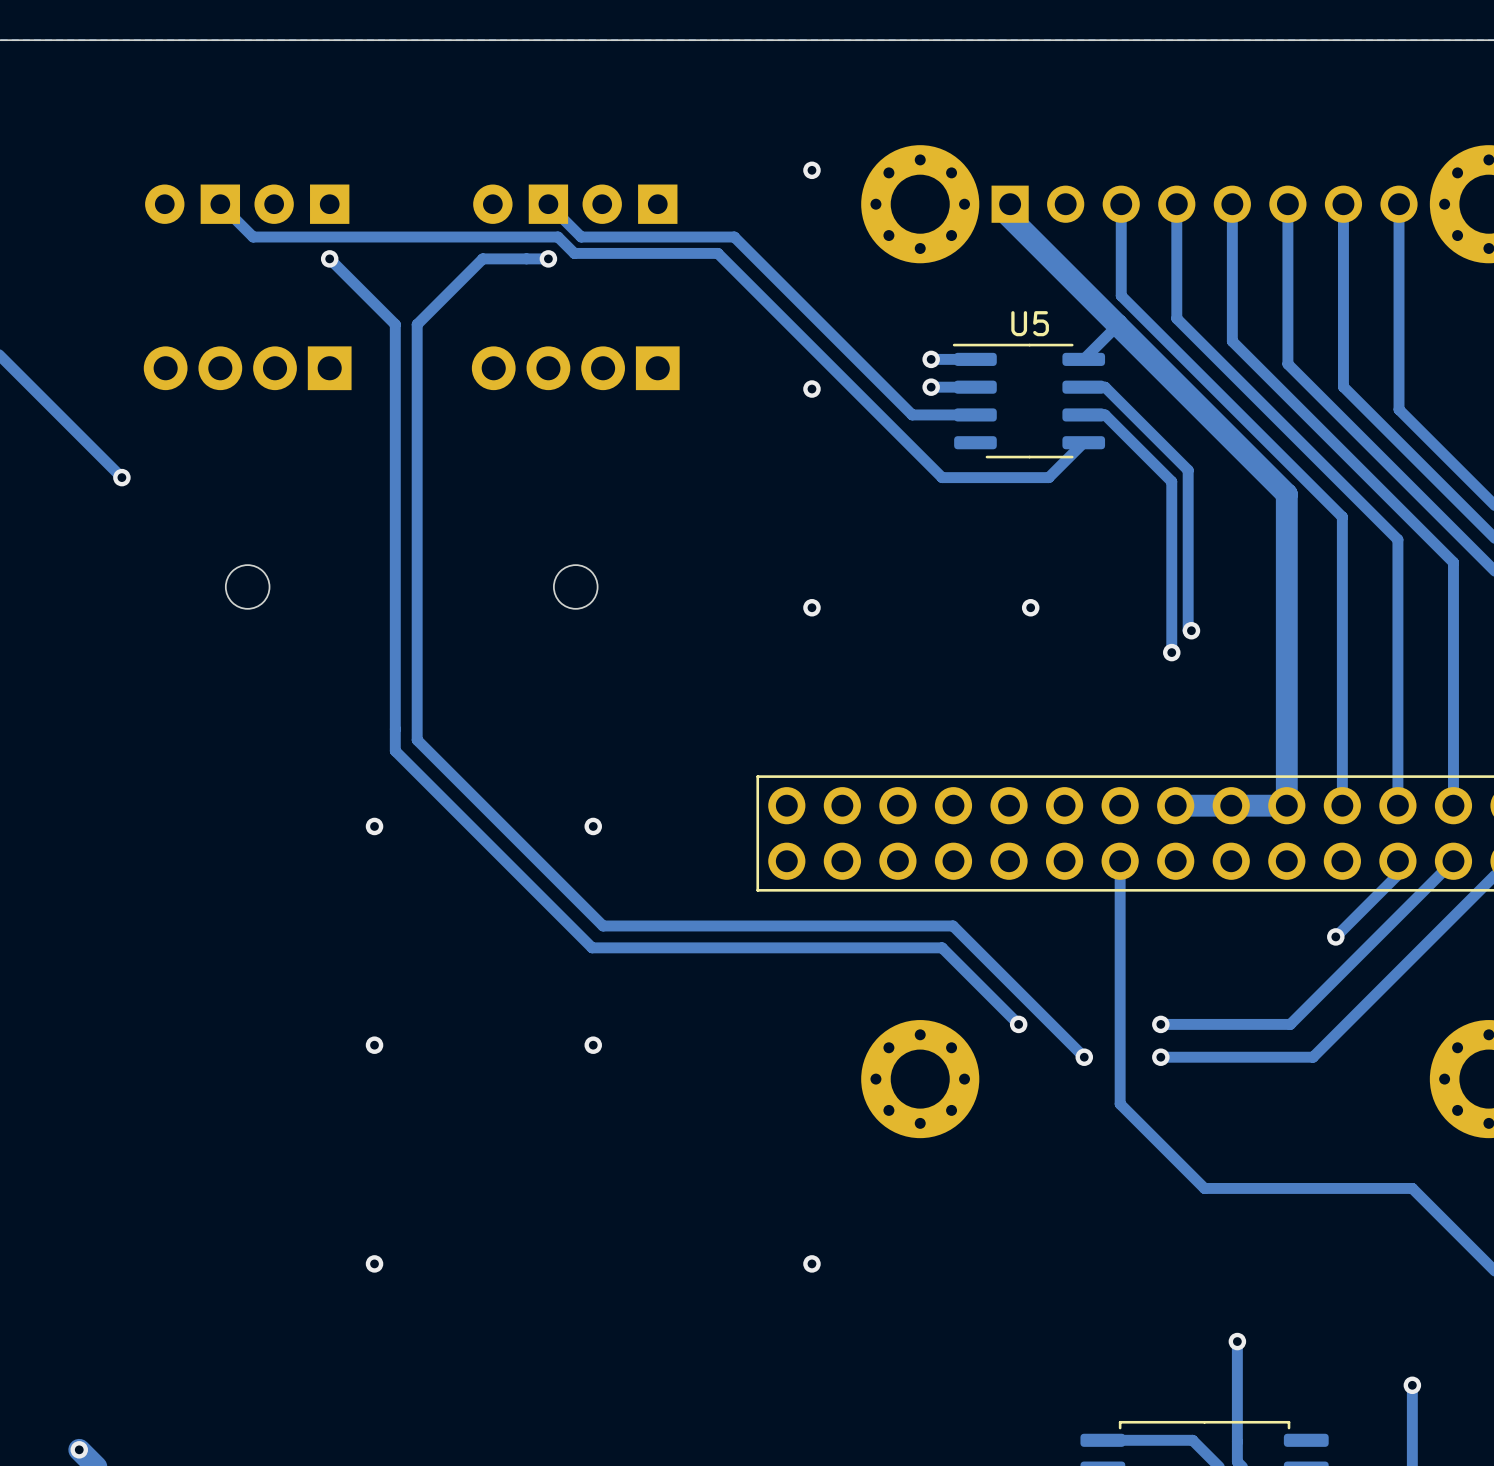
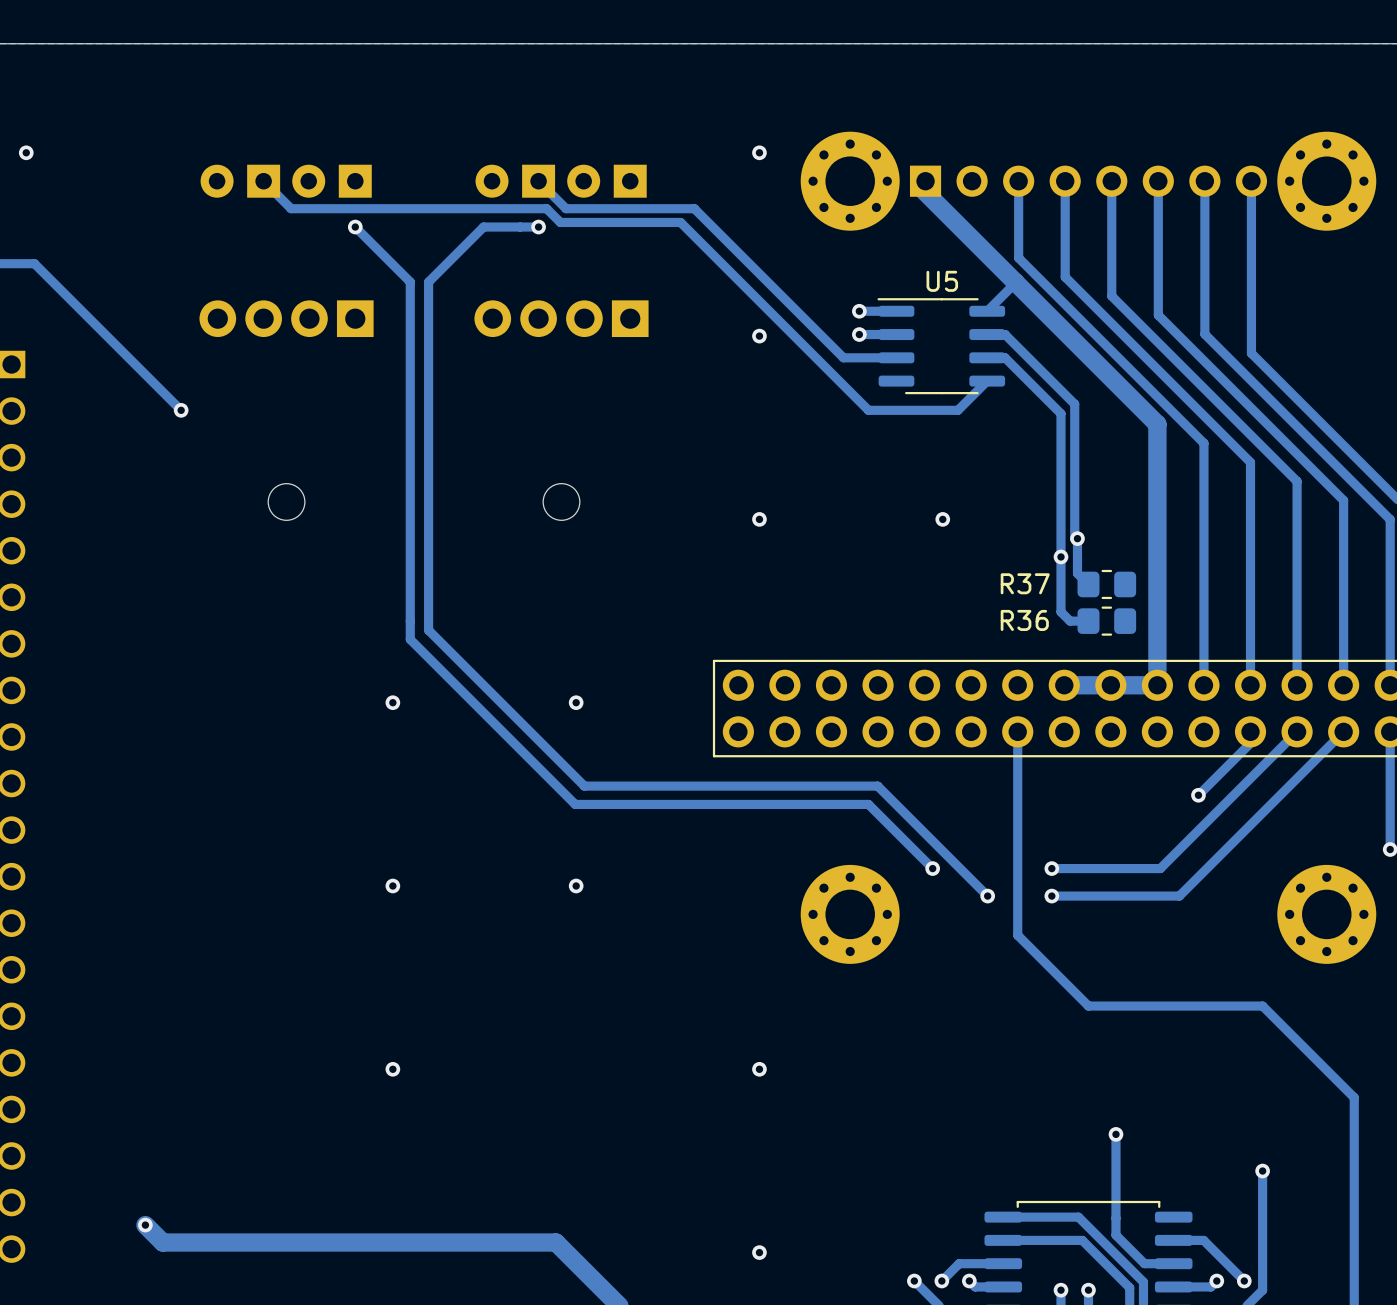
track: none -> (1077, 538) (1077, 573) (1088, 584)
track: none -> (1060, 556) (1060, 611) (1070, 621) (1088, 621)
R37: none -> (1106, 584)
R36: none -> (1106, 621)

